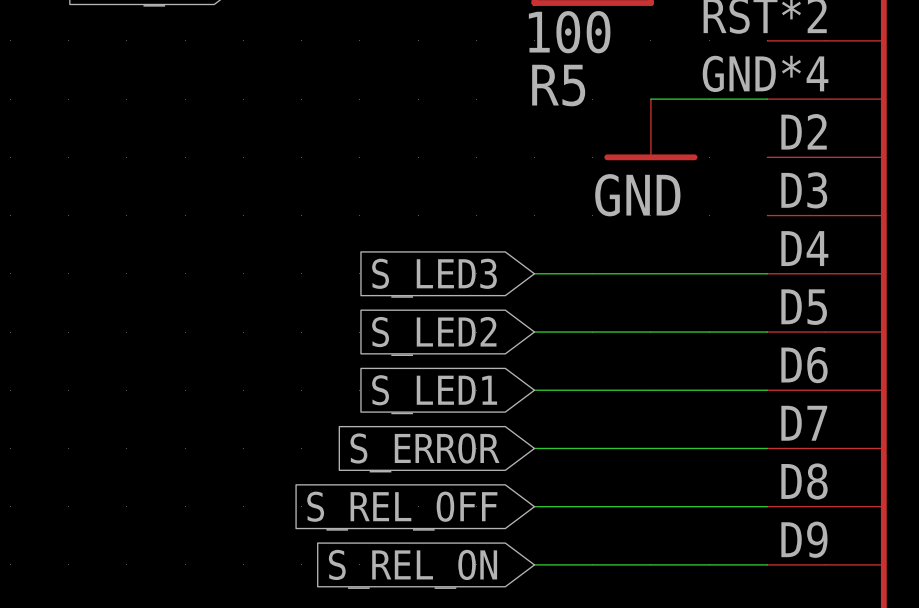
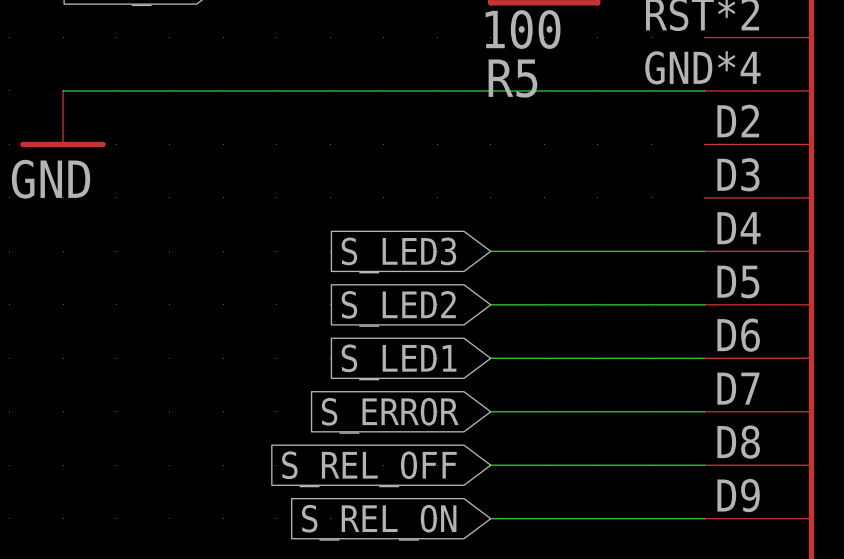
wire: none -> (63, 90) (597, 90)
power symbol: none -> GND (63, 119)
power symbol: GND (650, 129) -> none

